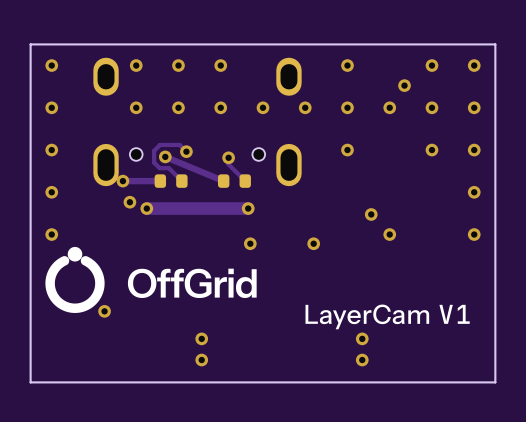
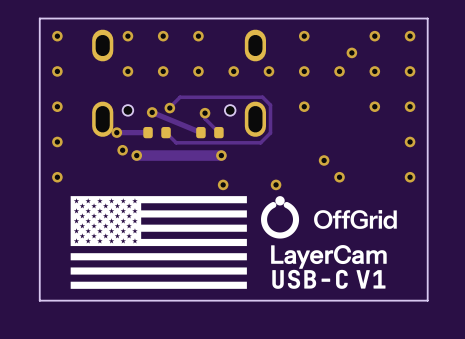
track: (186, 151) (179, 144) (160, 144) (154, 150) (154, 162) (159, 168) (168, 168) (181, 181) -> (169, 107) (180, 97) (262, 97) (270, 105) (270, 132) (260, 142) (176, 142) (166, 132)
drawing: [45, 246, 257, 313] -> none
drawing: none -> [70, 196, 397, 289]
drawing: [305, 304, 470, 330] -> none
via: (104, 311) -> none
via: (201, 338) -> none
via: (362, 338) -> none
via: (201, 360) -> none
via: (362, 360) -> none

